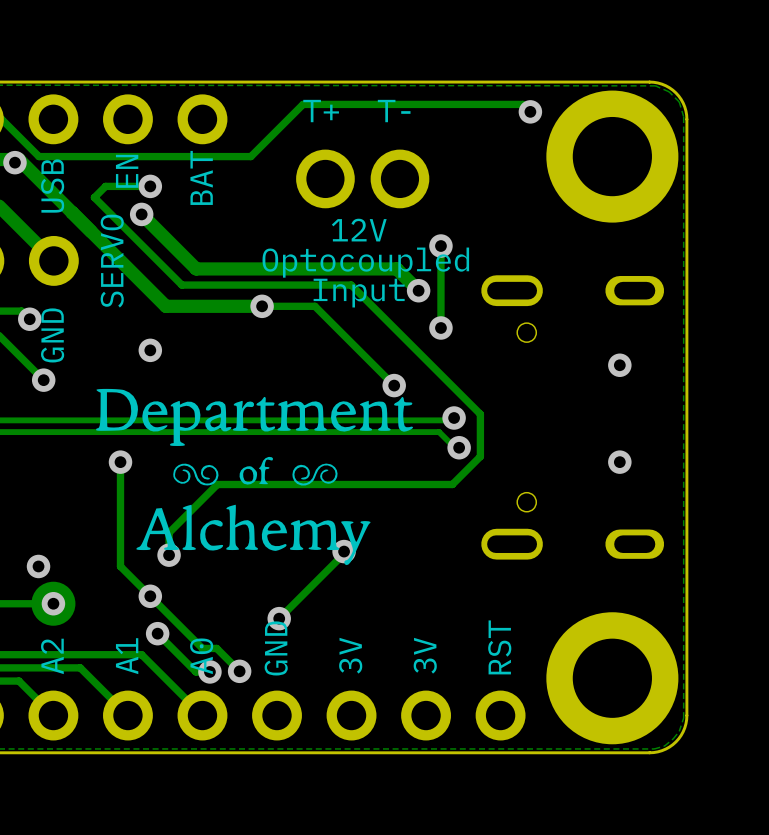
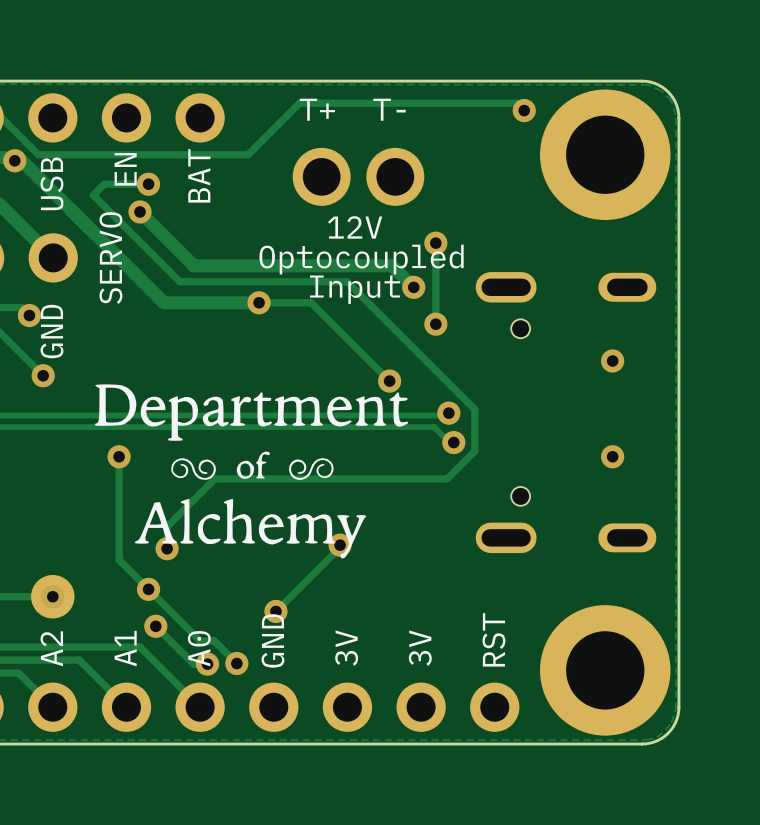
via: (150, 350) -> none
via: (38, 566) -> none

